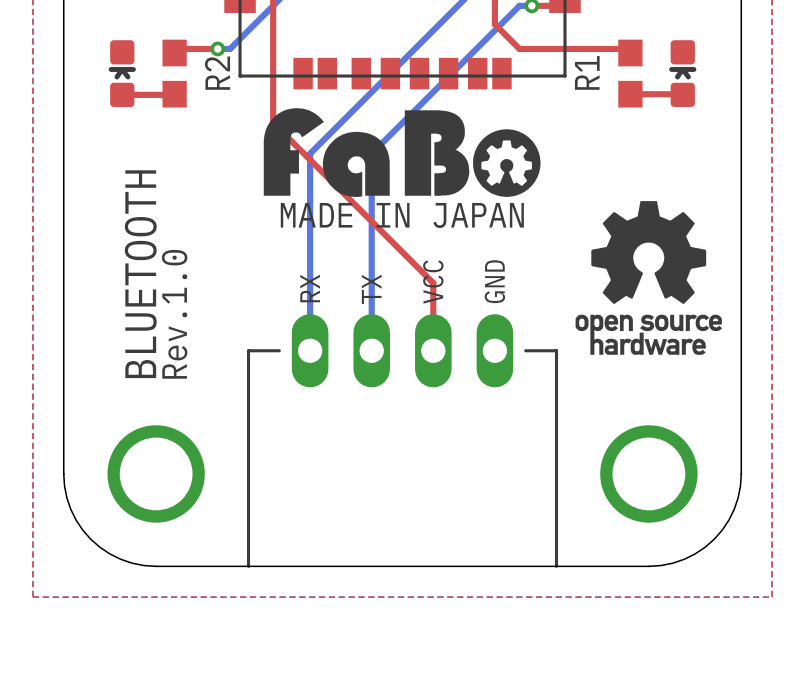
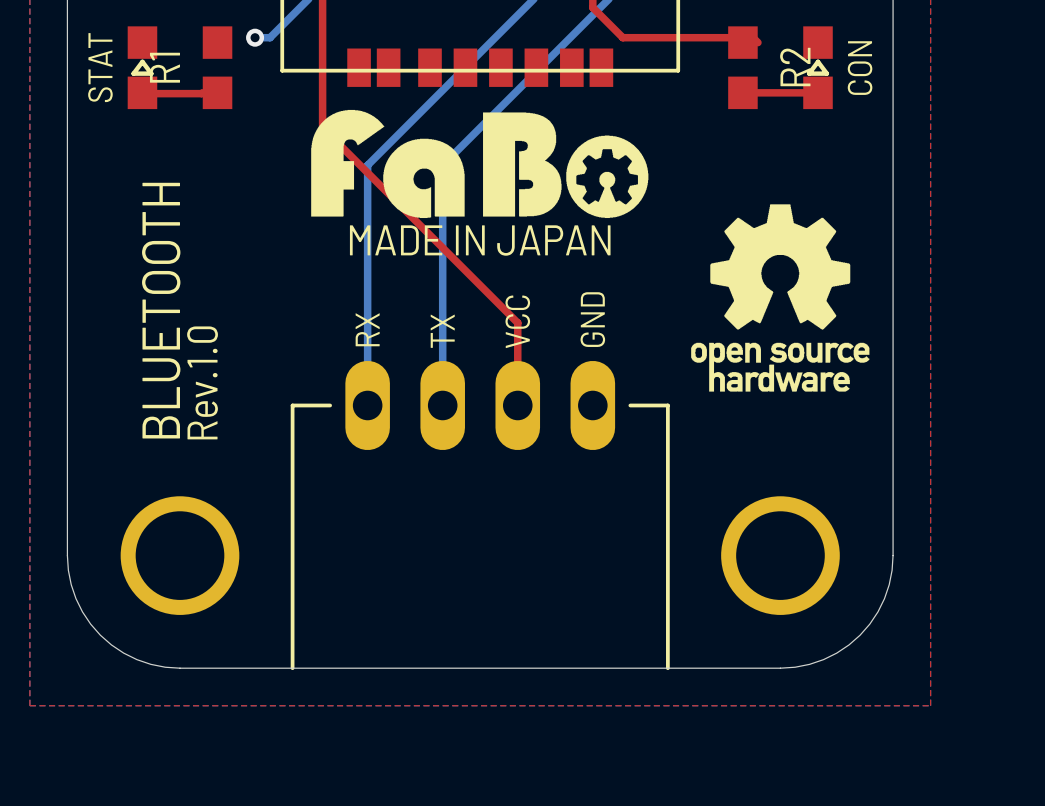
top track: (217, 48) (182, 48) (174, 52) -> none
part: (122, 73) -> none
STAT: none -> (142, 67)
R2 position: (174, 73) -> (742, 67)
R1 position: (630, 73) -> (217, 67)
CON: none -> (818, 67)
part: (682, 73) -> none
drawing position: (648, 277) -> (780, 297)

